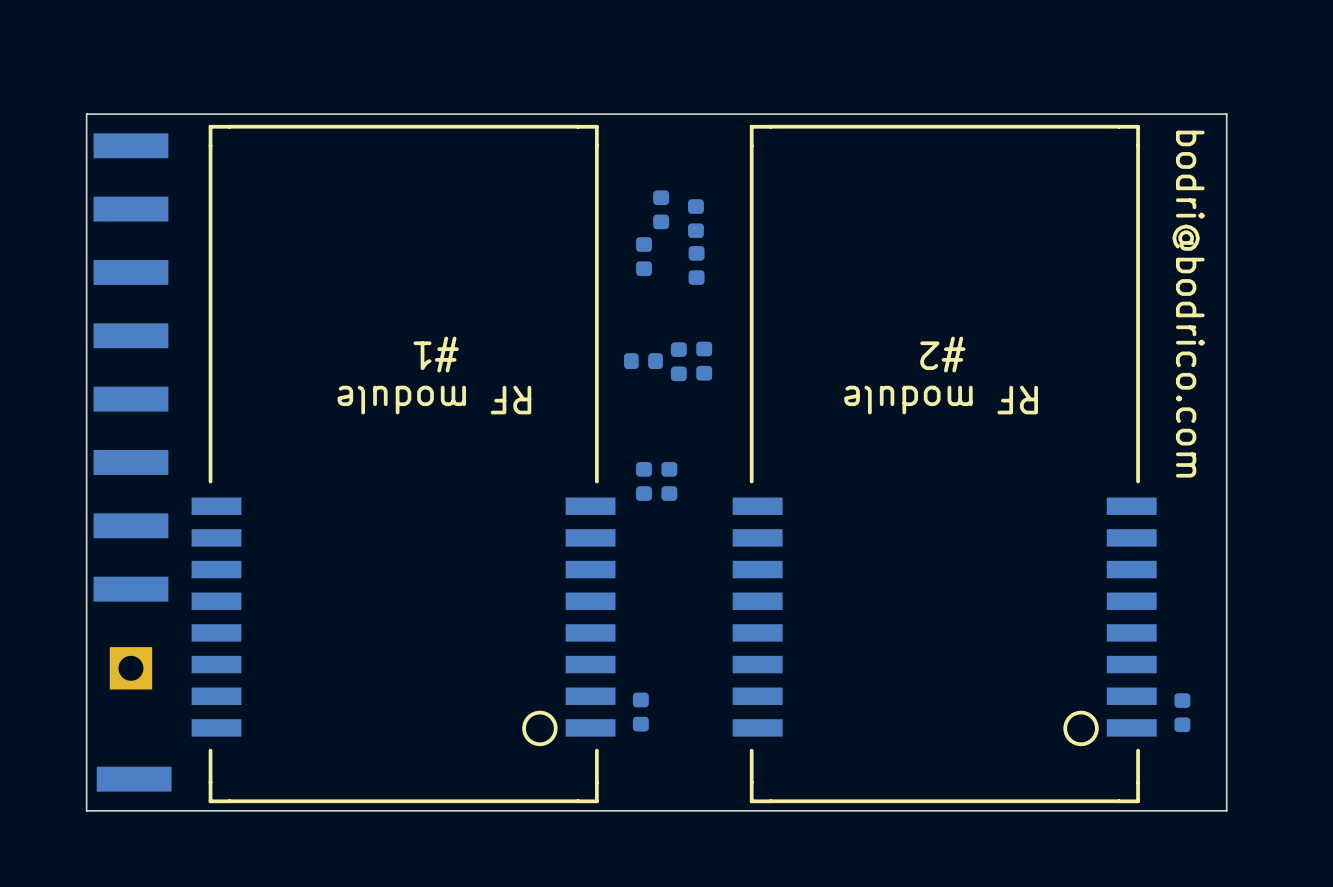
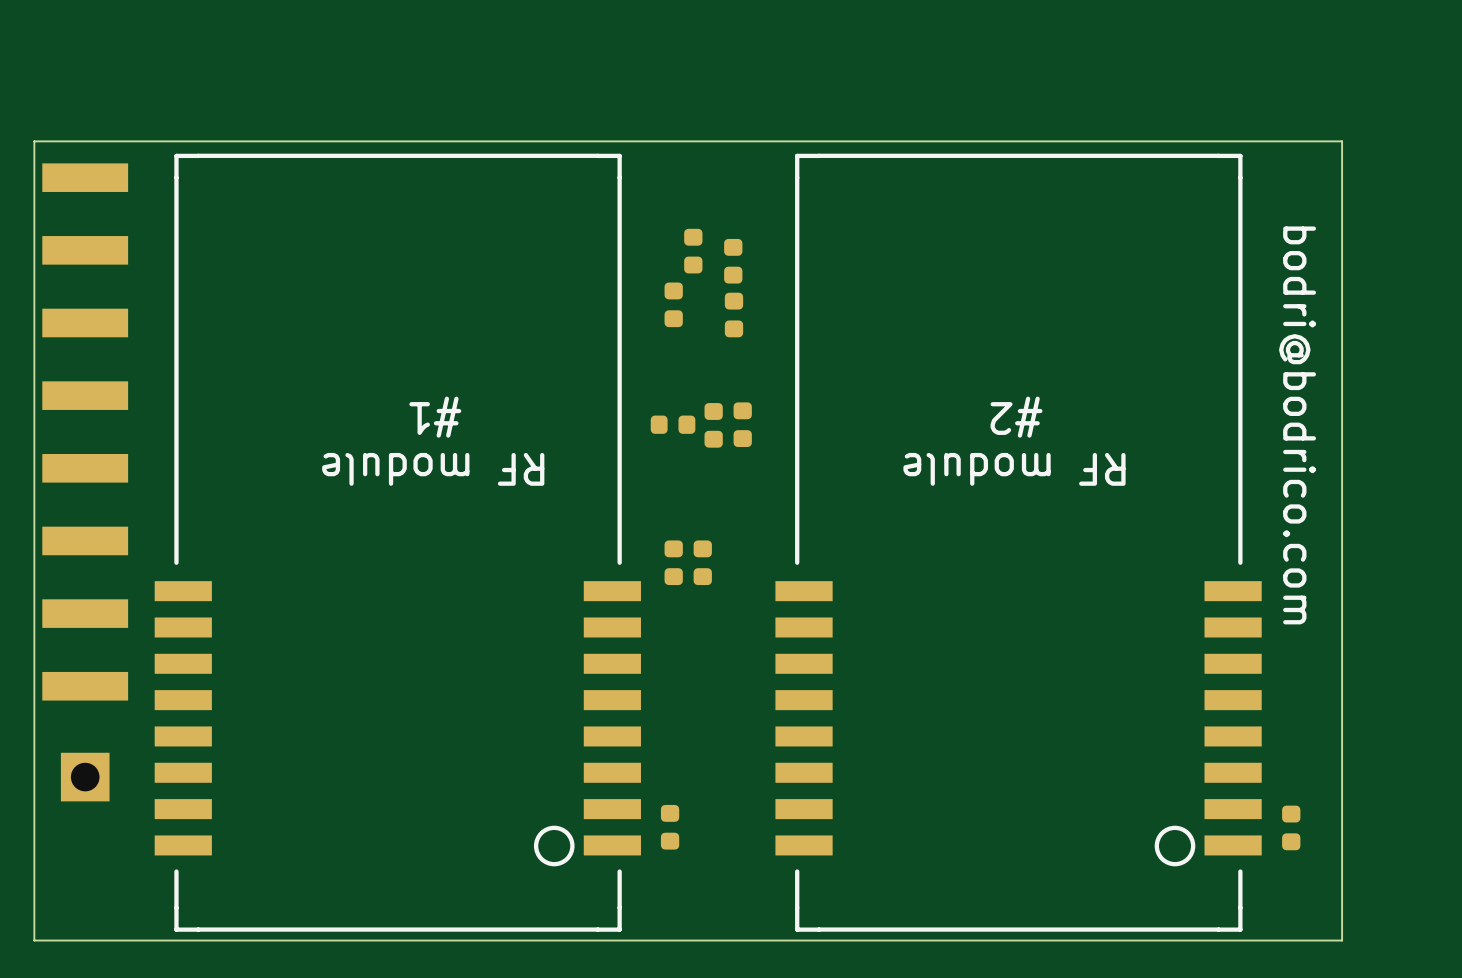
text position: bodri@bodrico.com (1188, 304) -> bodri@bodrico.com (1297, 425)
part: (134, 779) -> none

